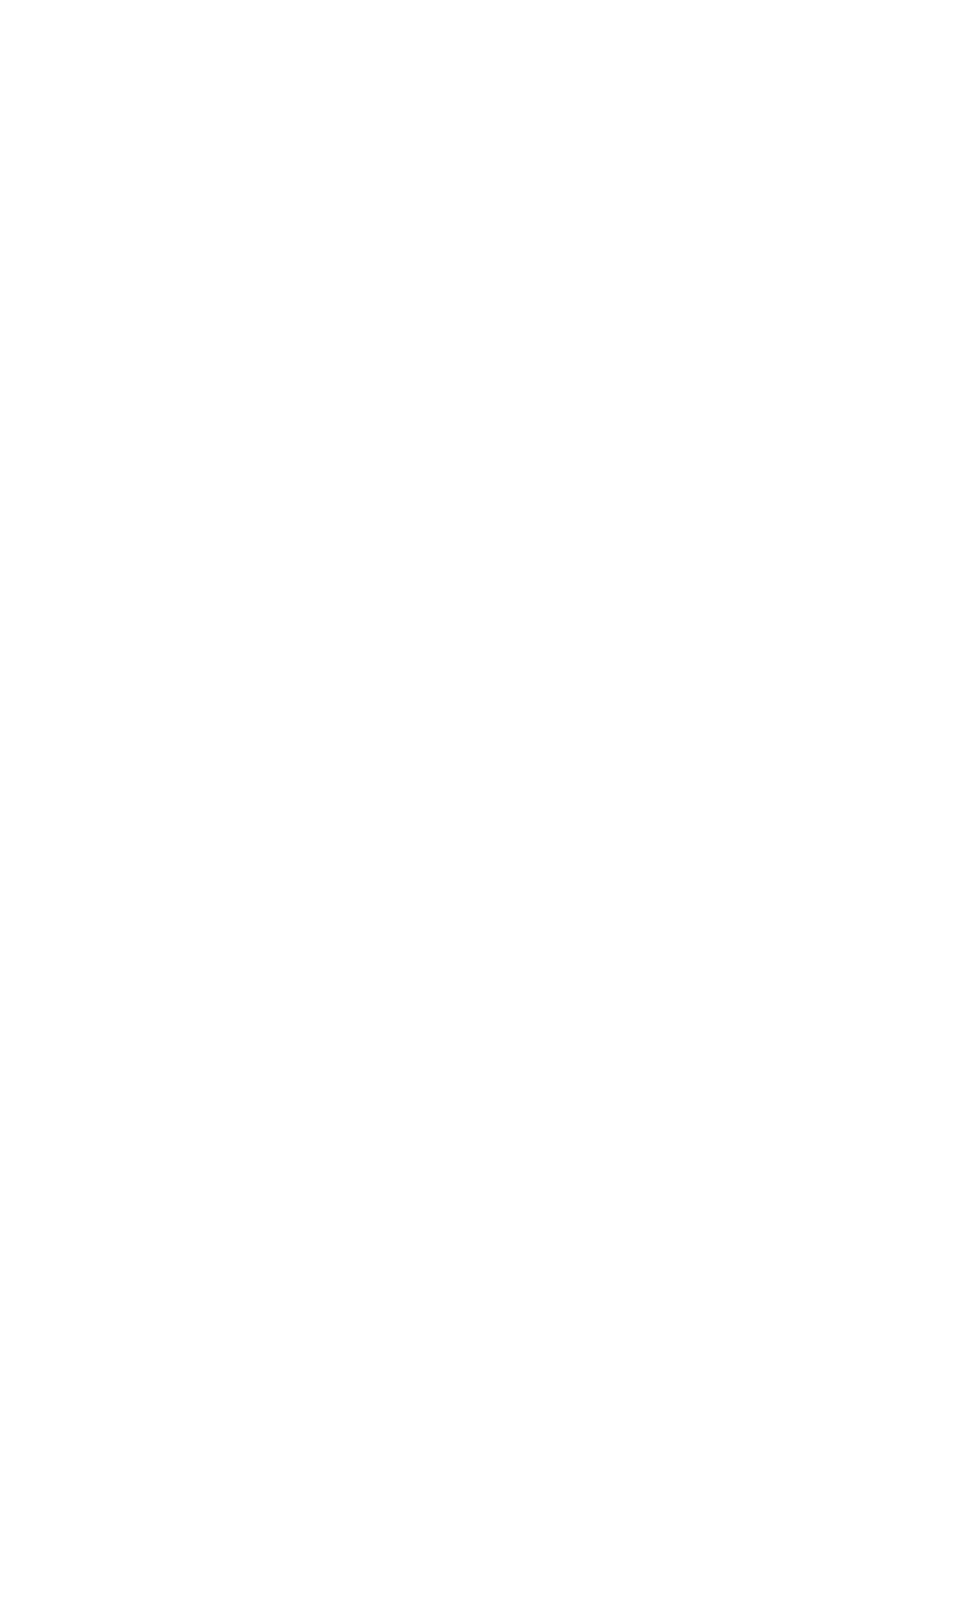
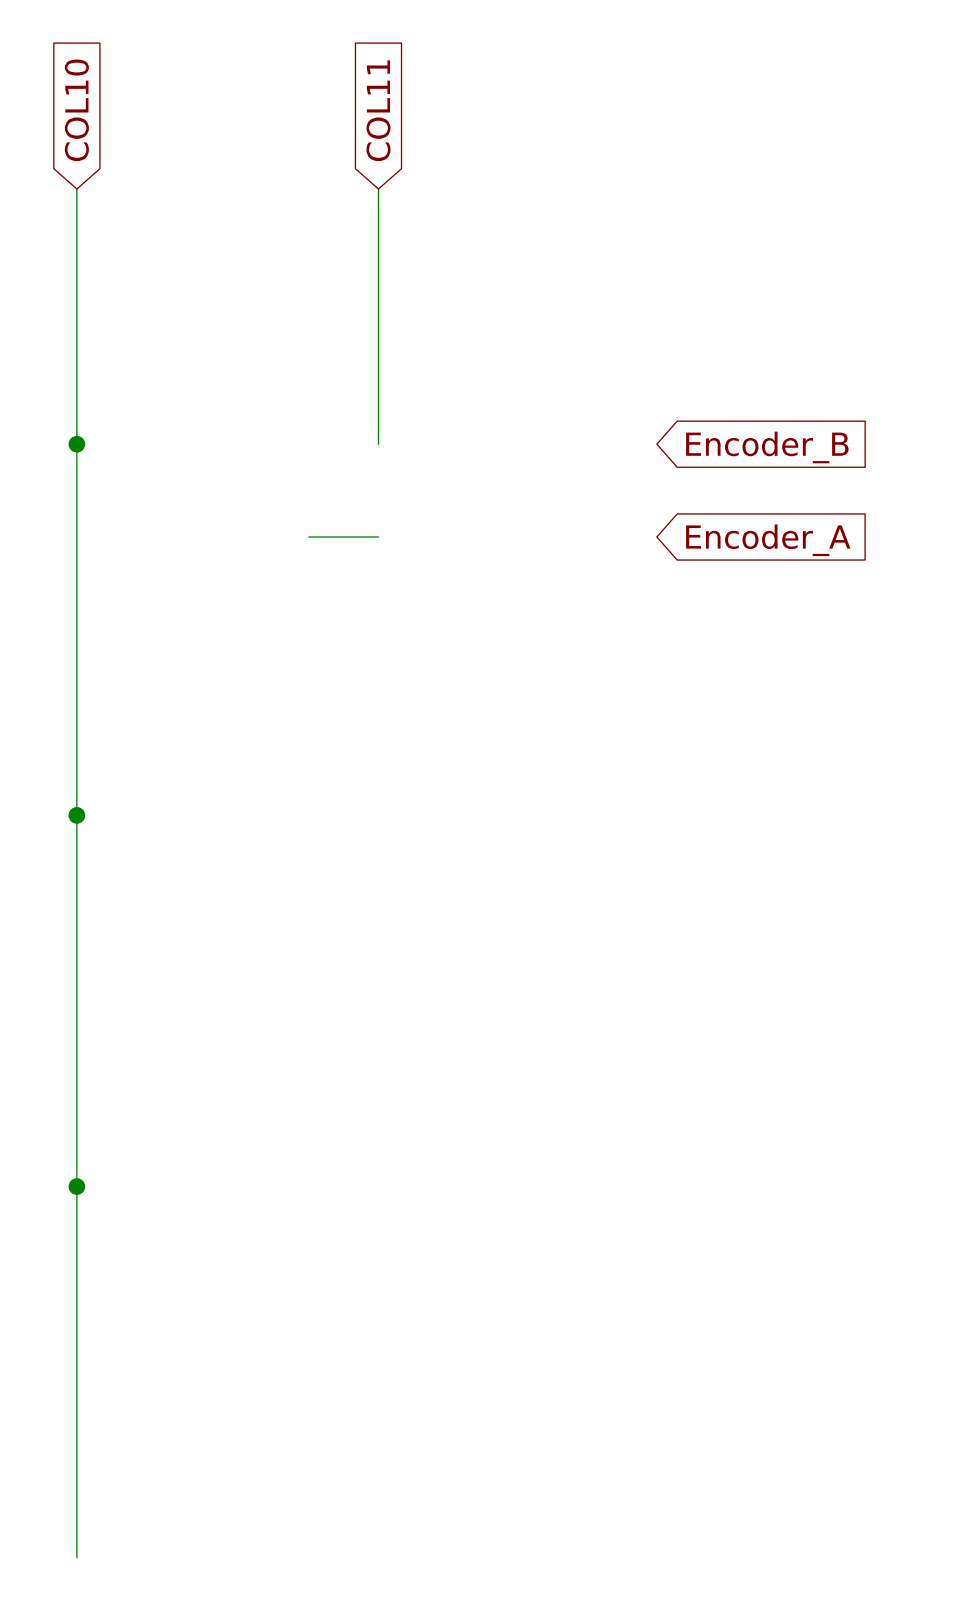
global label: none -> COL10 (76, 110)
global label: none -> COL11 (378, 110)
wire: none -> (76, 189) (76, 1557)
wire: none -> (378, 189) (378, 444)
junction: none -> (76, 444)
global label: none -> Encoder_B (767, 447)
wire: none -> (308, 537) (378, 537)
global label: none -> Encoder_A (768, 540)
junction: none -> (76, 815)
junction: none -> (76, 1186)

